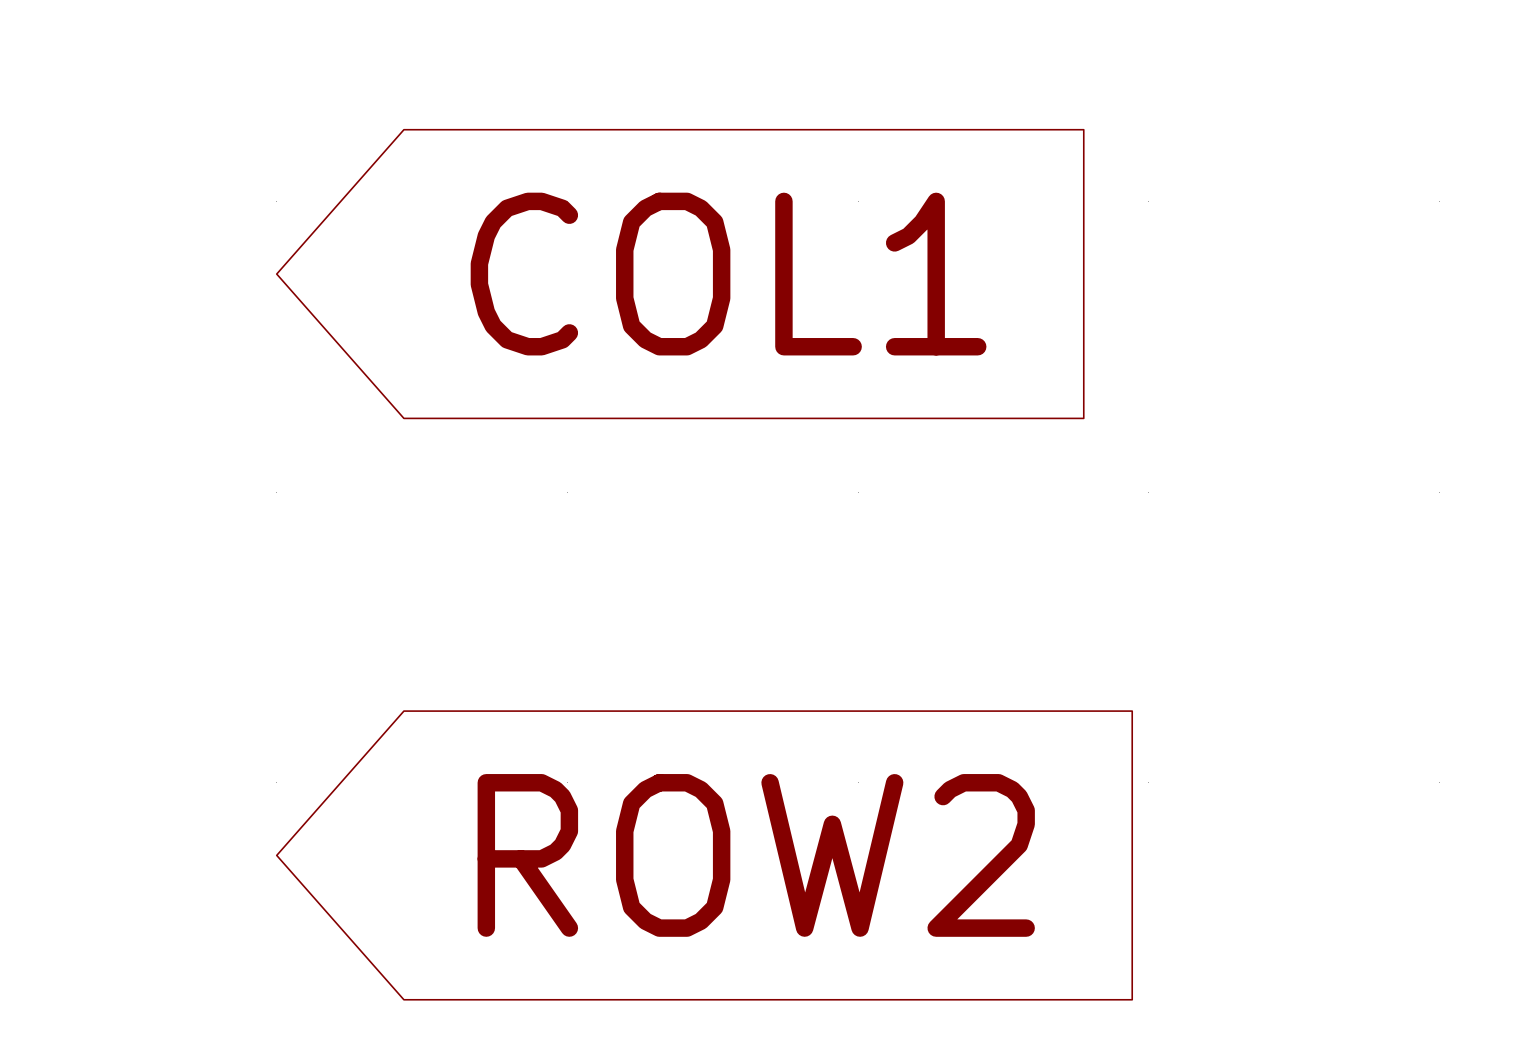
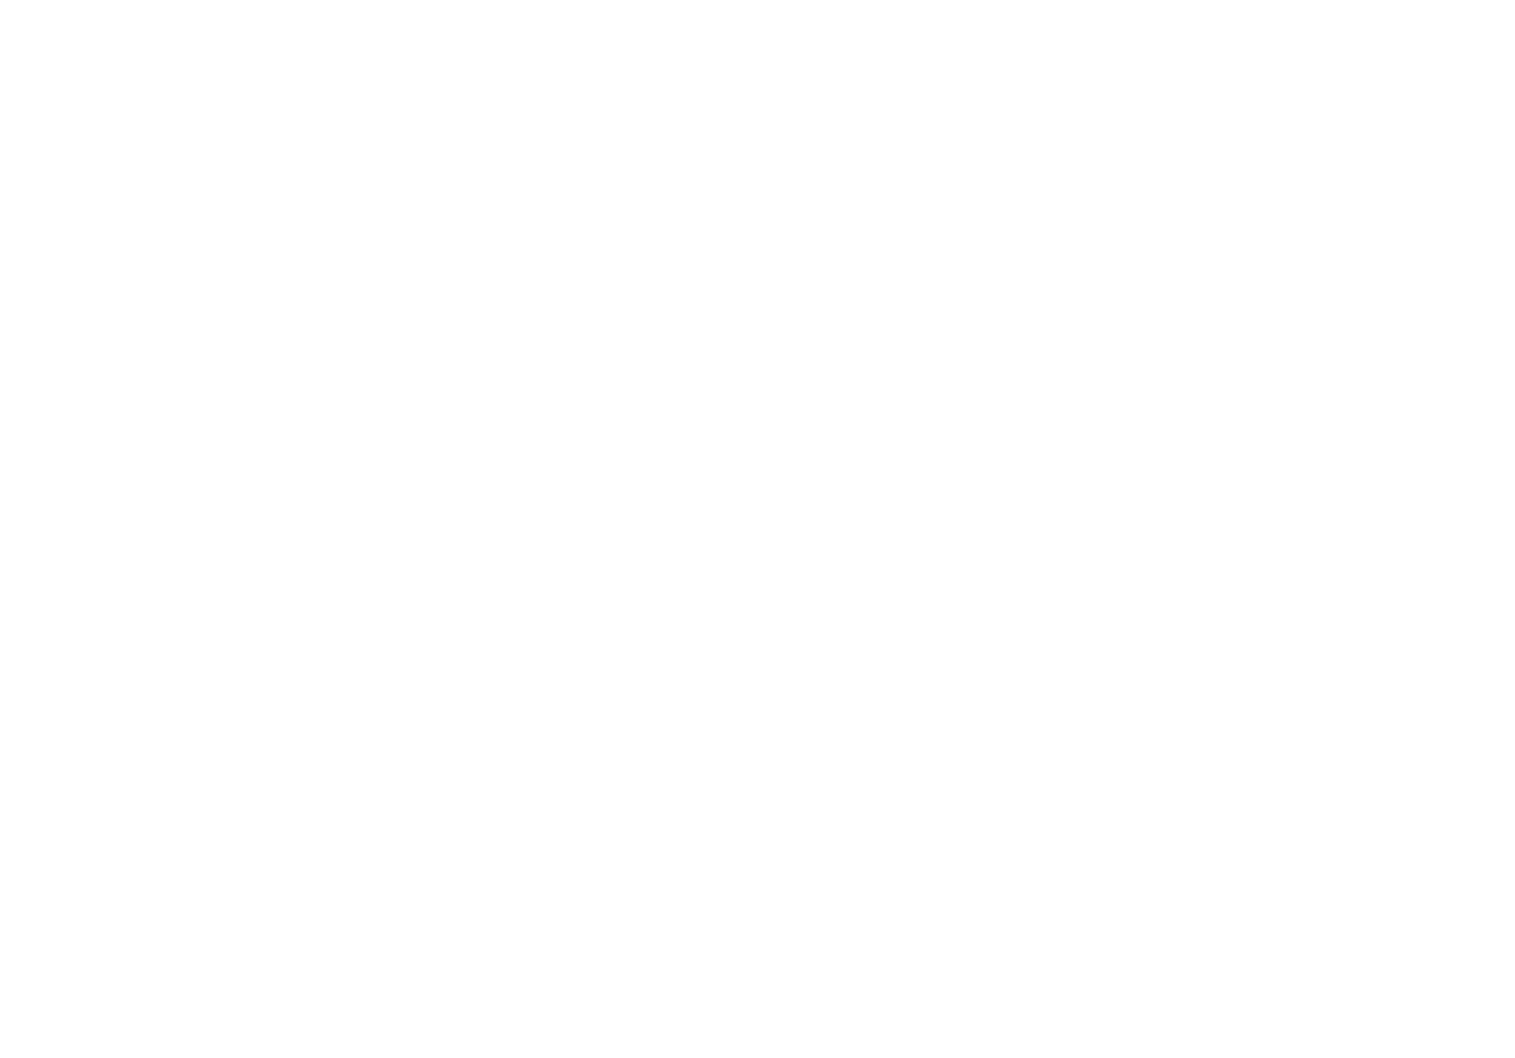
global label: COL1 (728, 274) -> none
global label: ROW2 (756, 855) -> none

